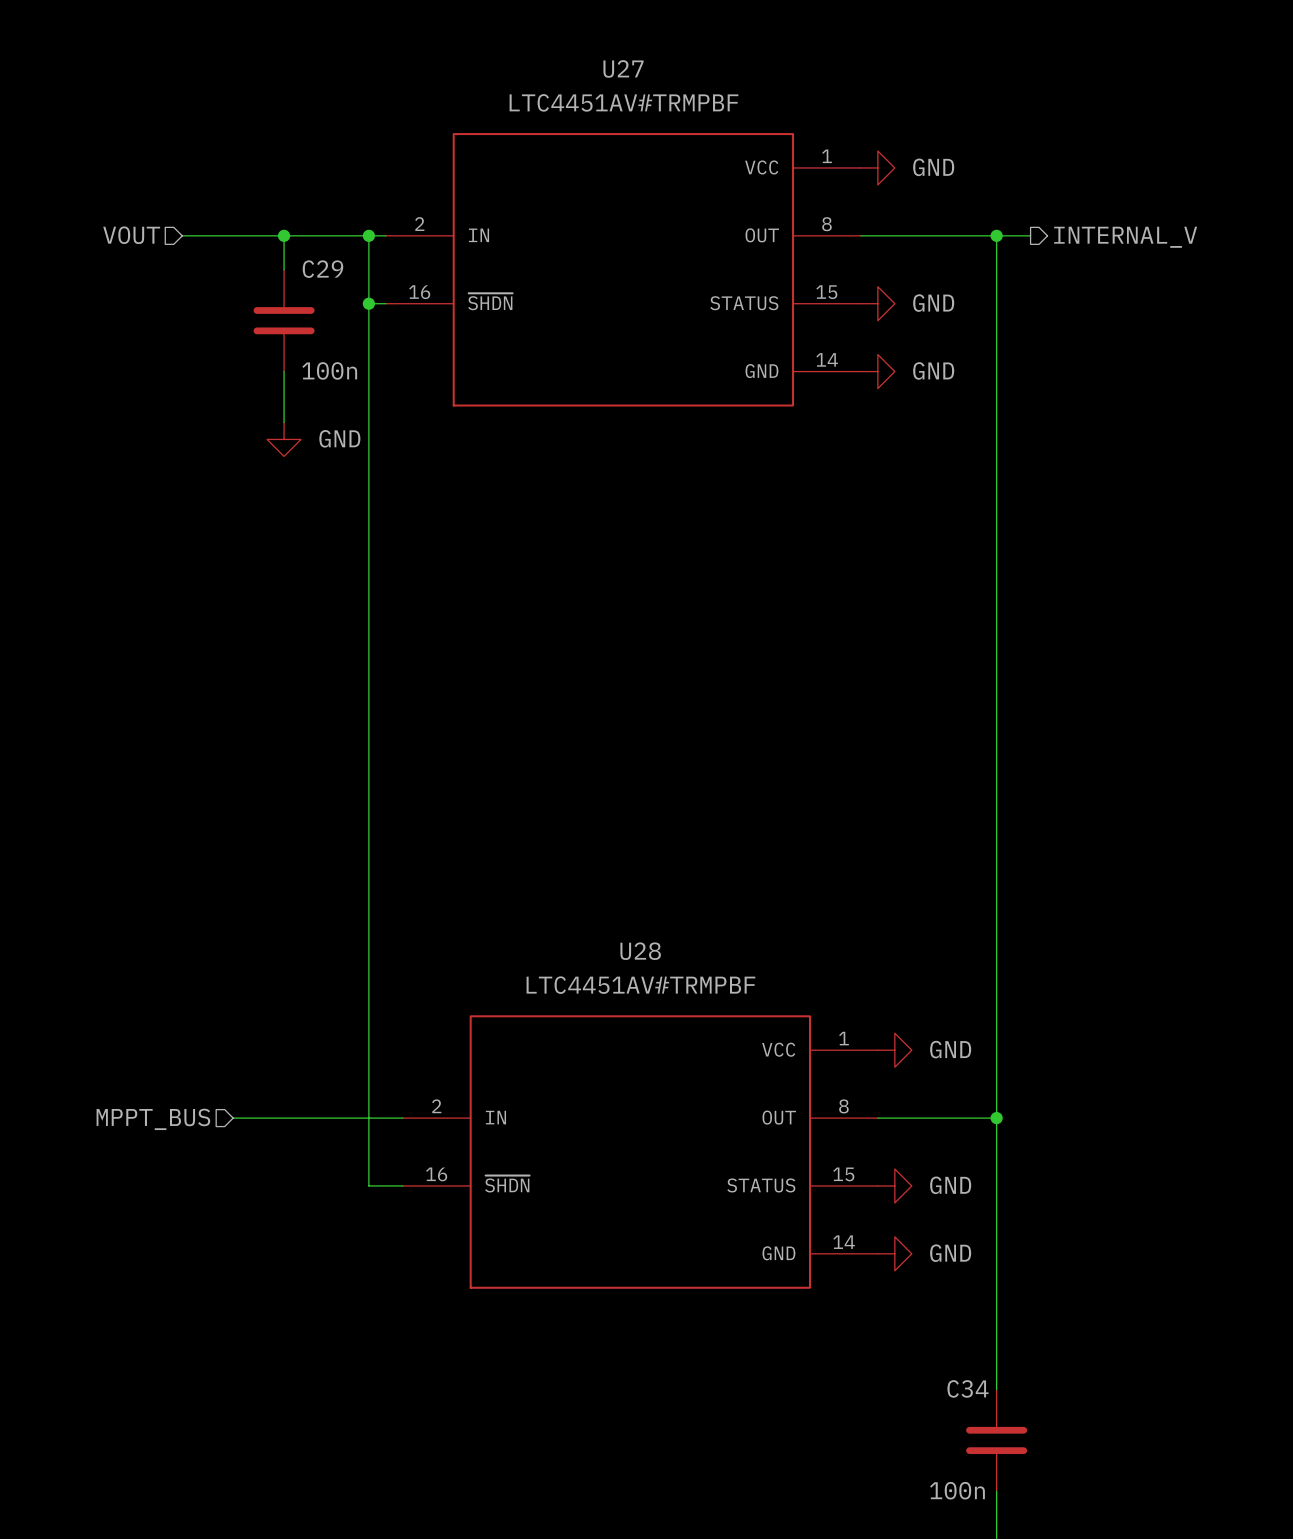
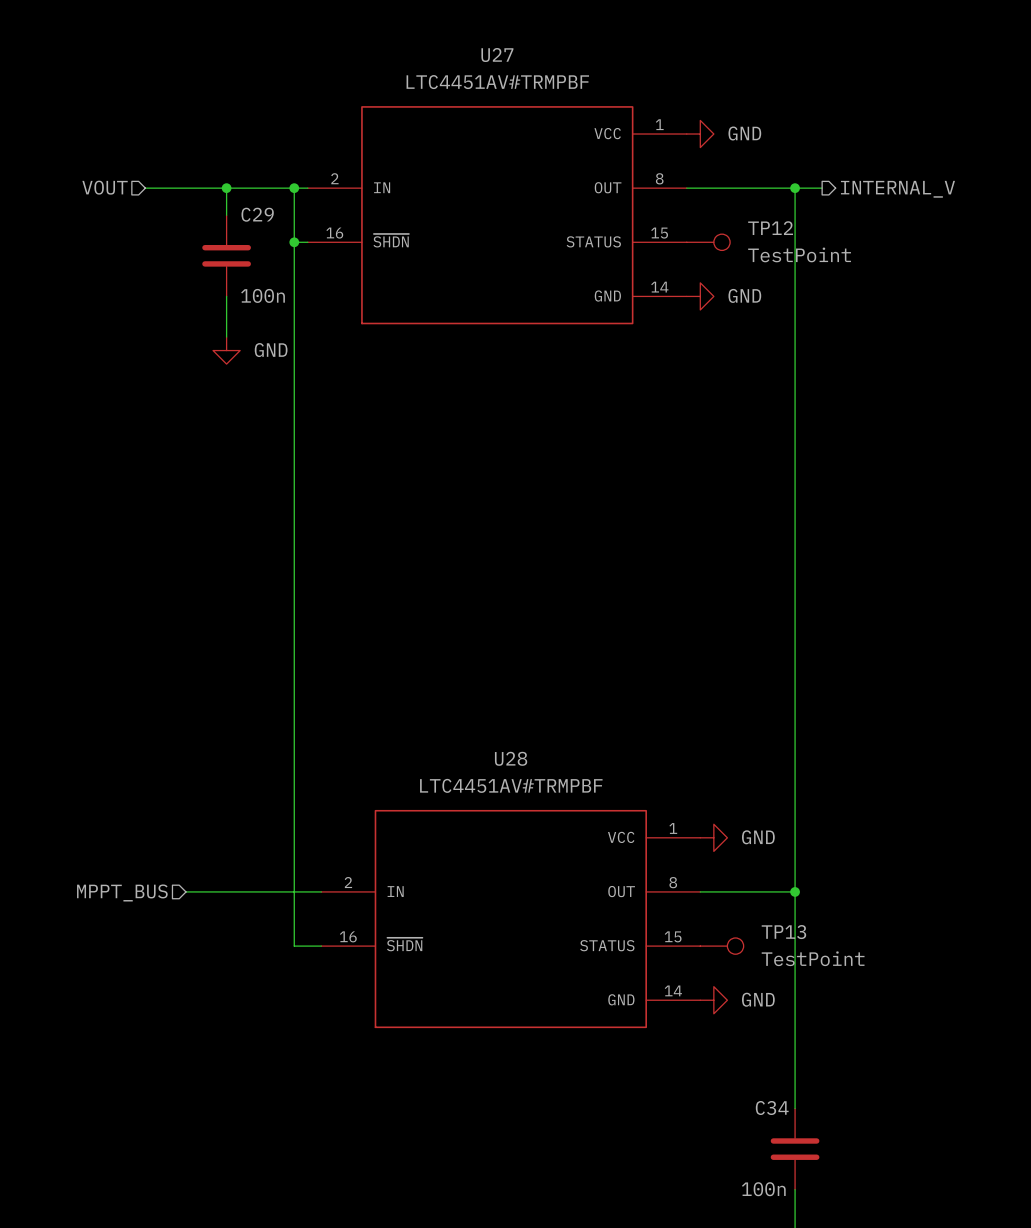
power symbol: GND (877, 303) -> none
TP12: none -> TestPoint (708, 242)
power symbol: GND (894, 1185) -> none
TP13: none -> TestPoint (721, 946)

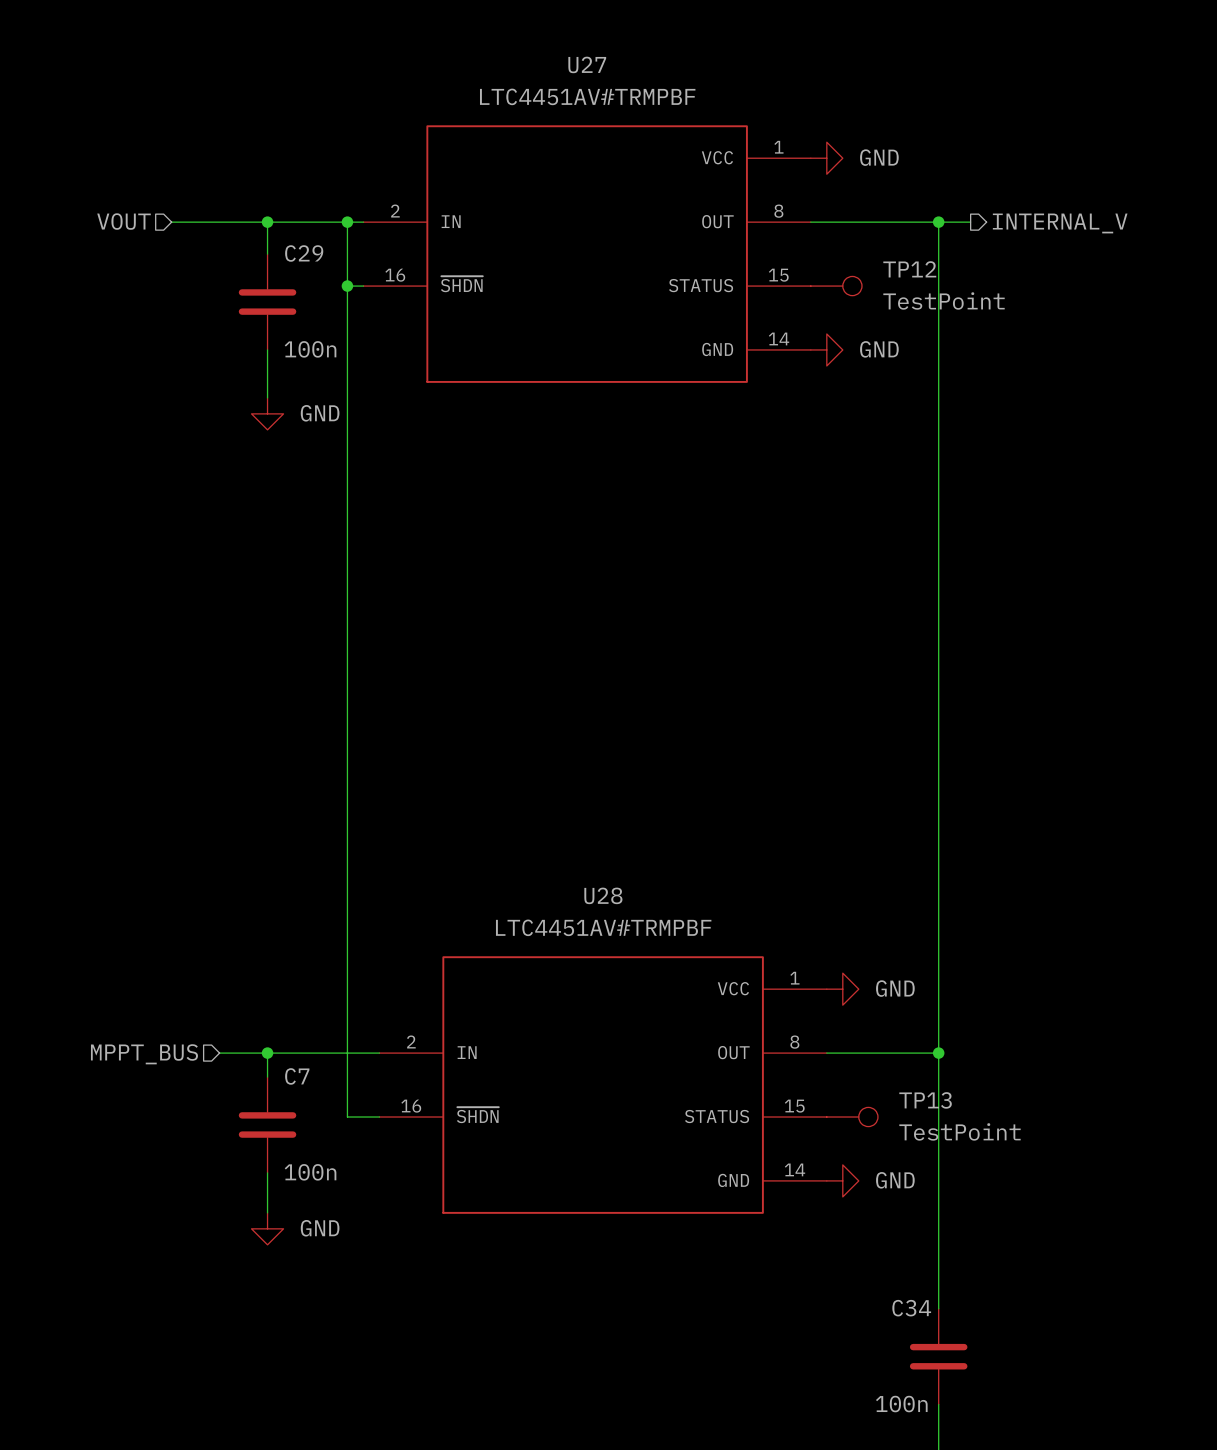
wire: none -> (267, 1053) (267, 1077)
junction: none -> (267, 1053)
C7: none -> 100n (267, 1124)
wire: none -> (267, 1172) (267, 1212)
power symbol: none -> GND (267, 1228)

